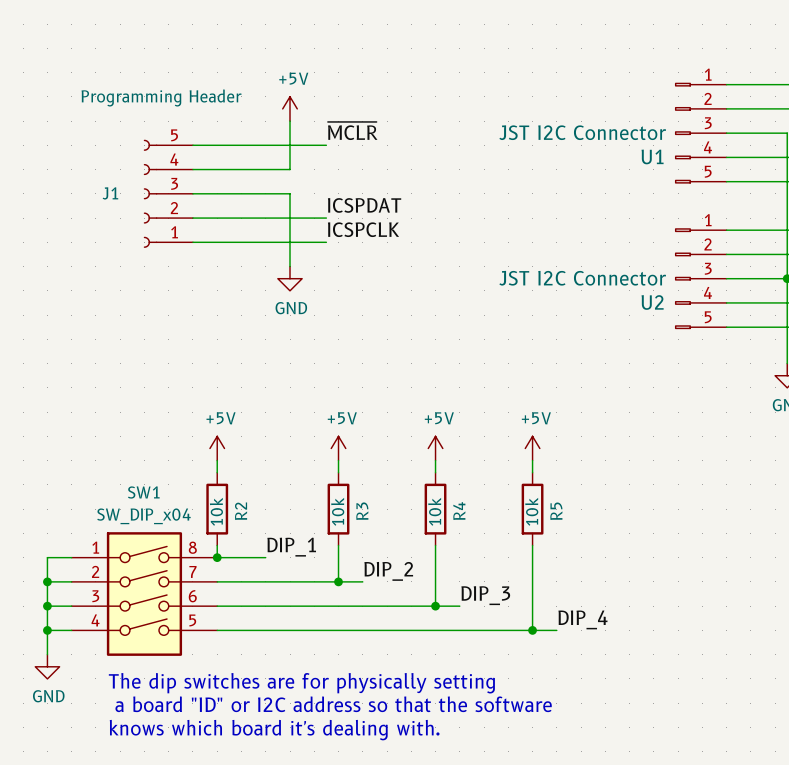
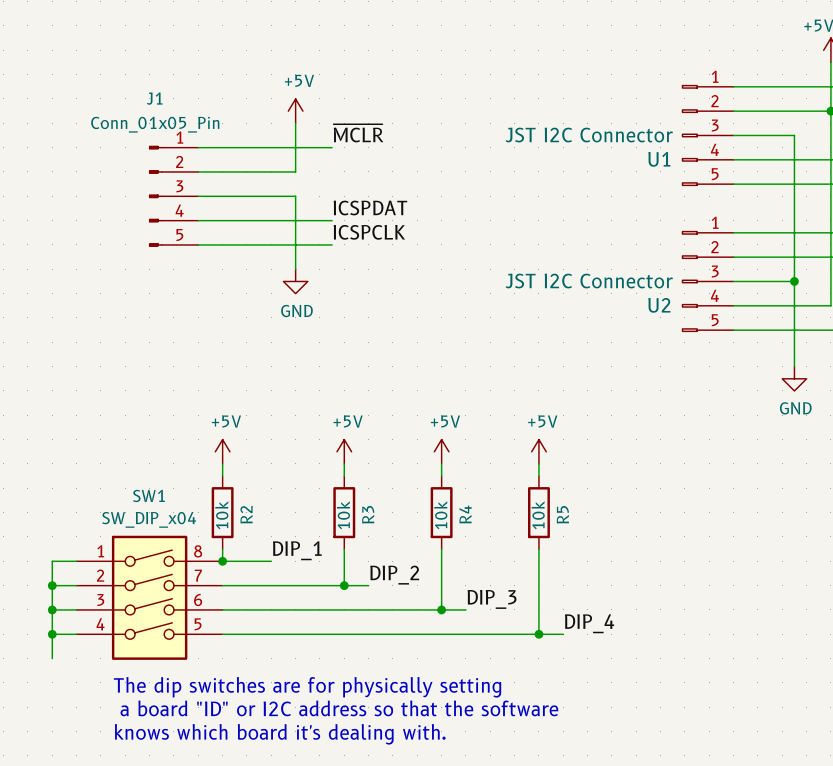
J1 value: Programming Header (161, 97) -> Conn_01x05_Pin (155, 124)
J1 symbol: [143, 139, 193, 248] -> [148, 145, 199, 247]
J1 name position: J1 (110, 193) -> J1 (154, 98)
power symbol: GND (47, 666) -> none

